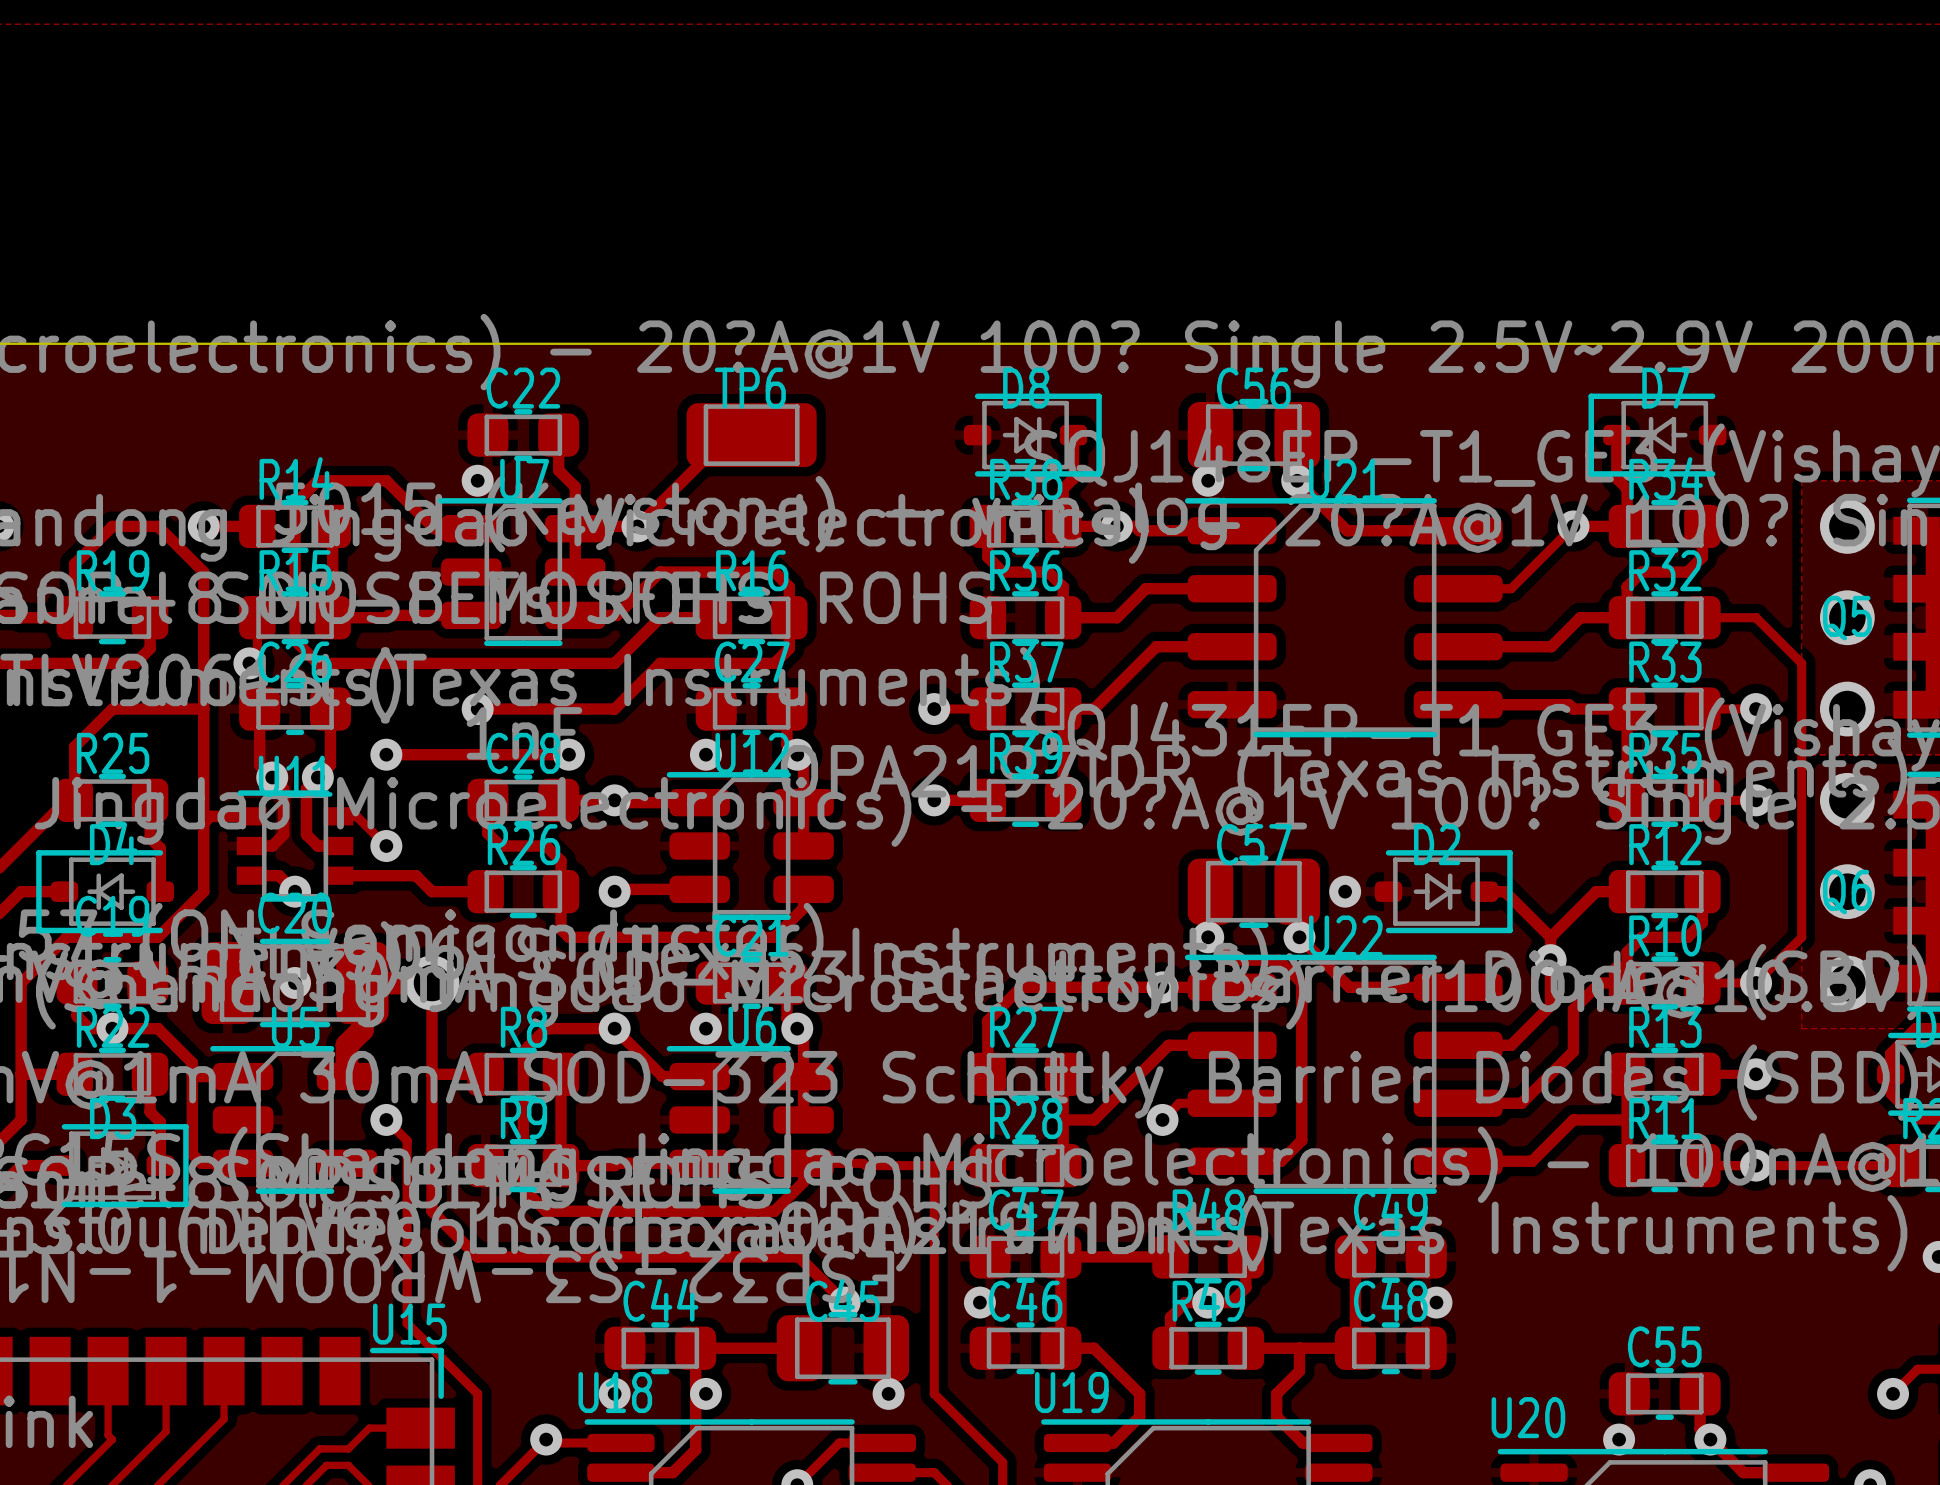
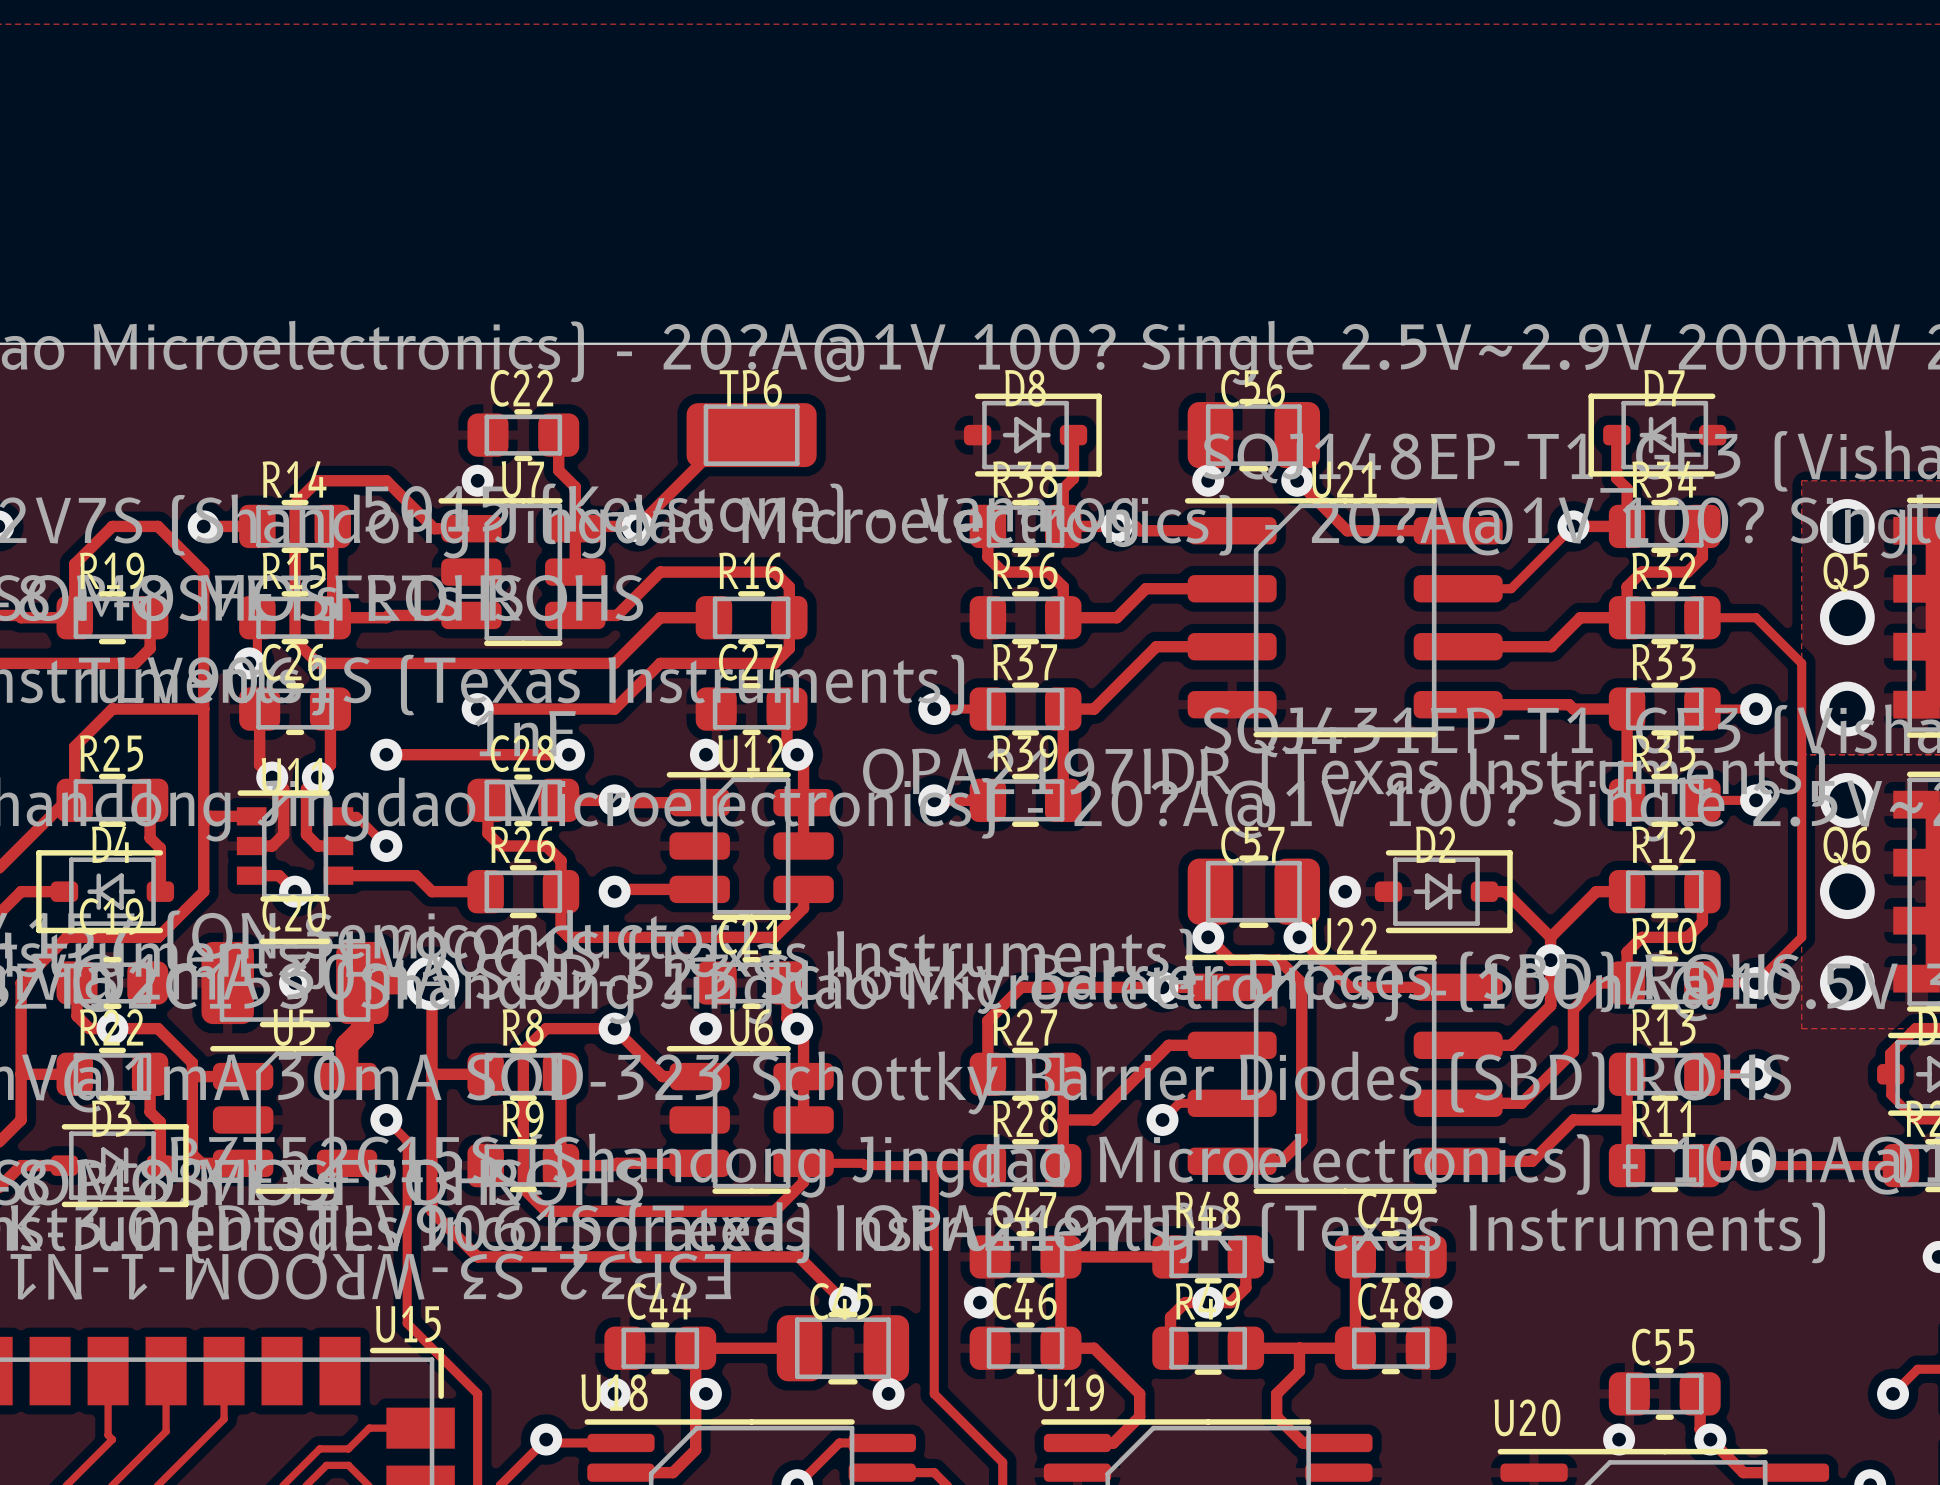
Q5 name position: Q5 (1847, 618) -> Q5 (1846, 572)
Q6 name position: Q6 (1847, 892) -> Q6 (1846, 846)

